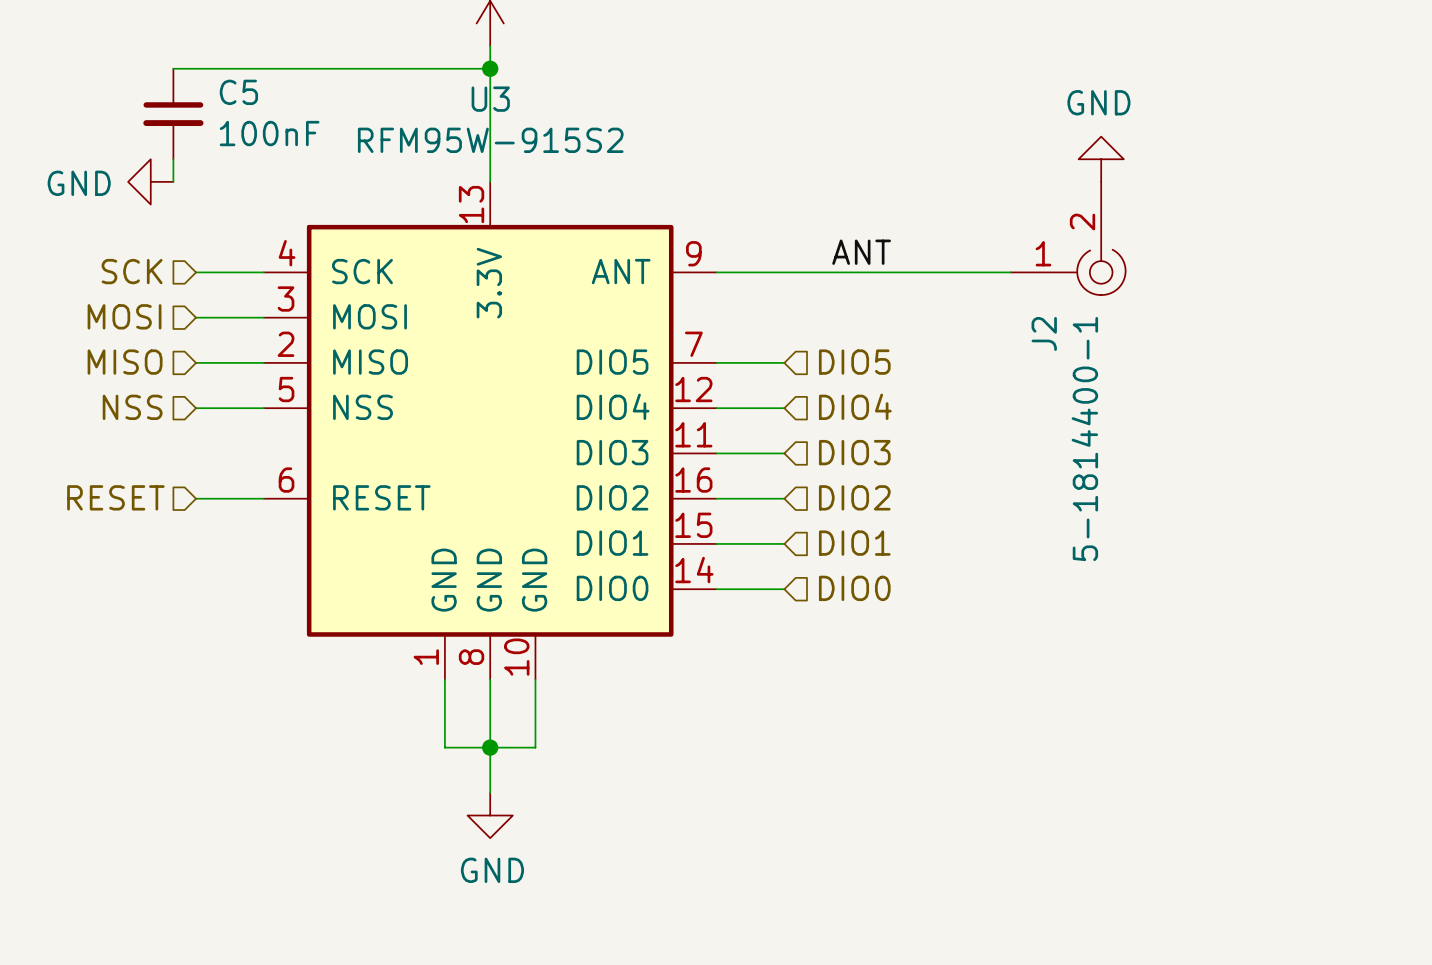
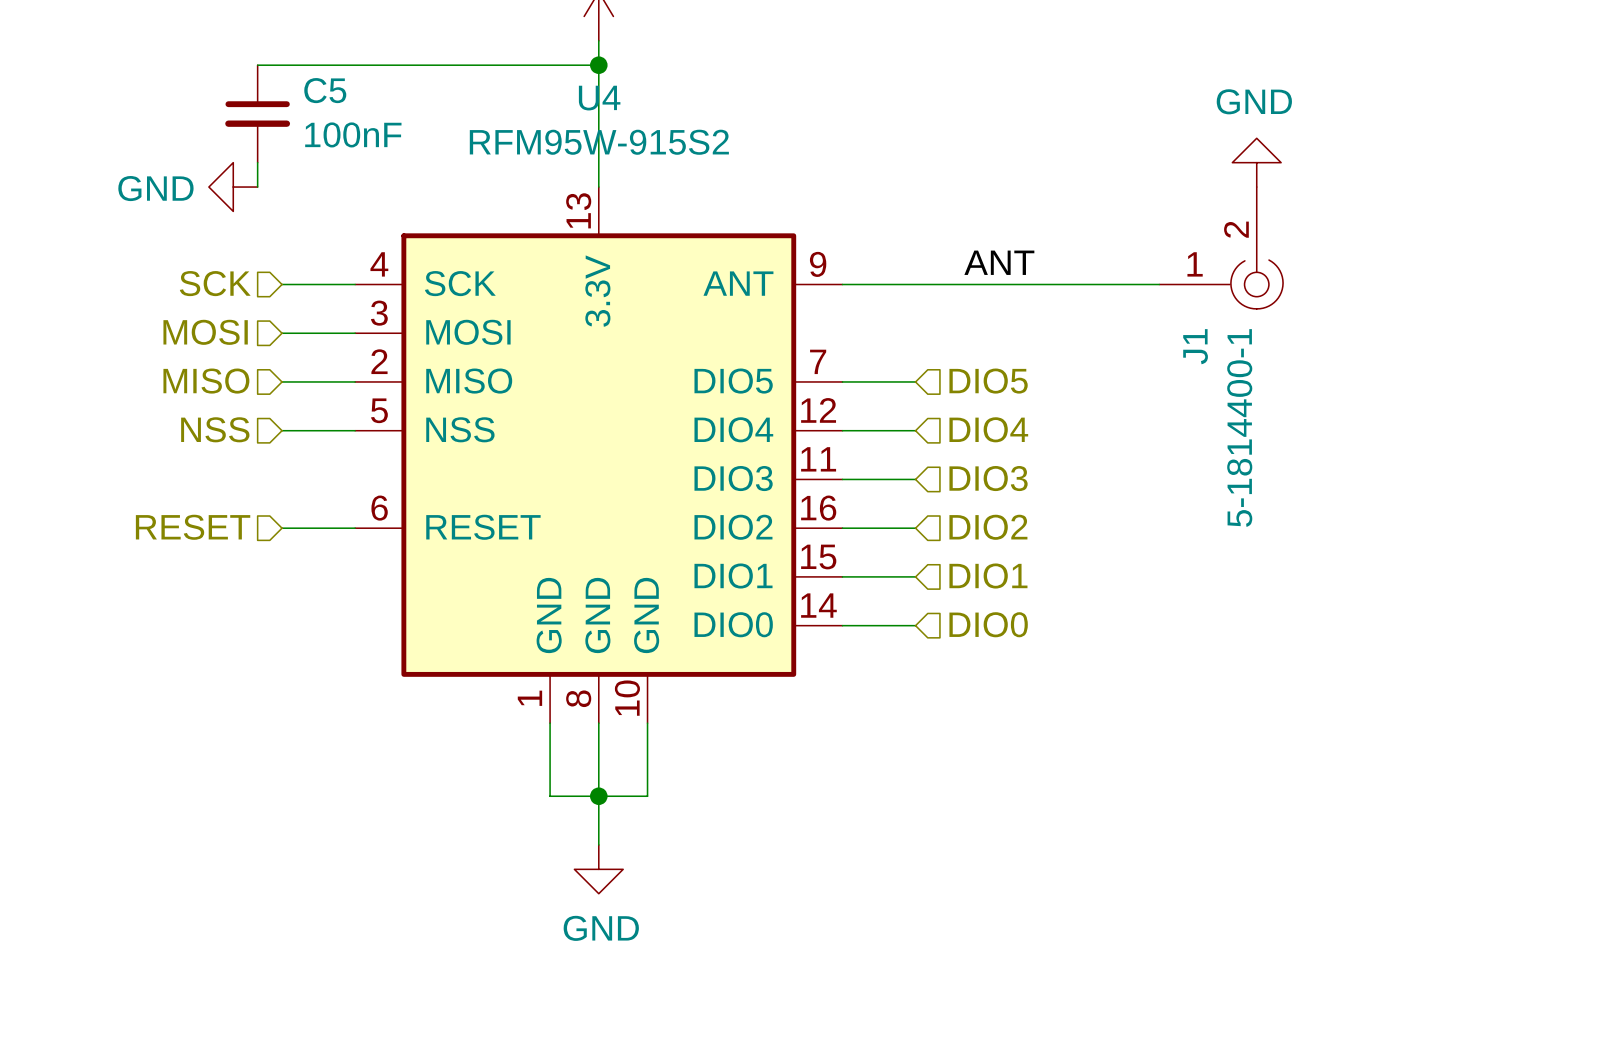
U3 name: U3 (490, 99) -> U4 (599, 98)
J2 name: J2 (1044, 333) -> J1 (1195, 346)

